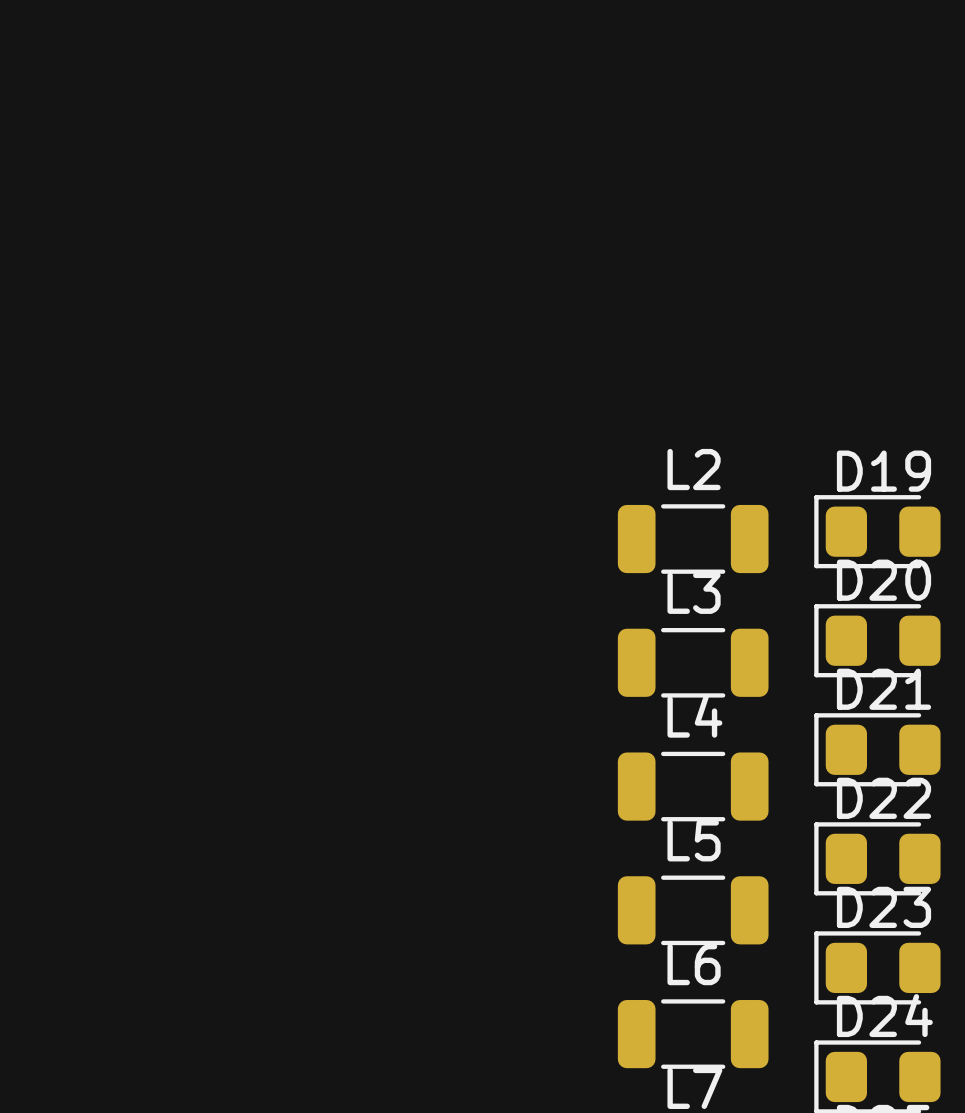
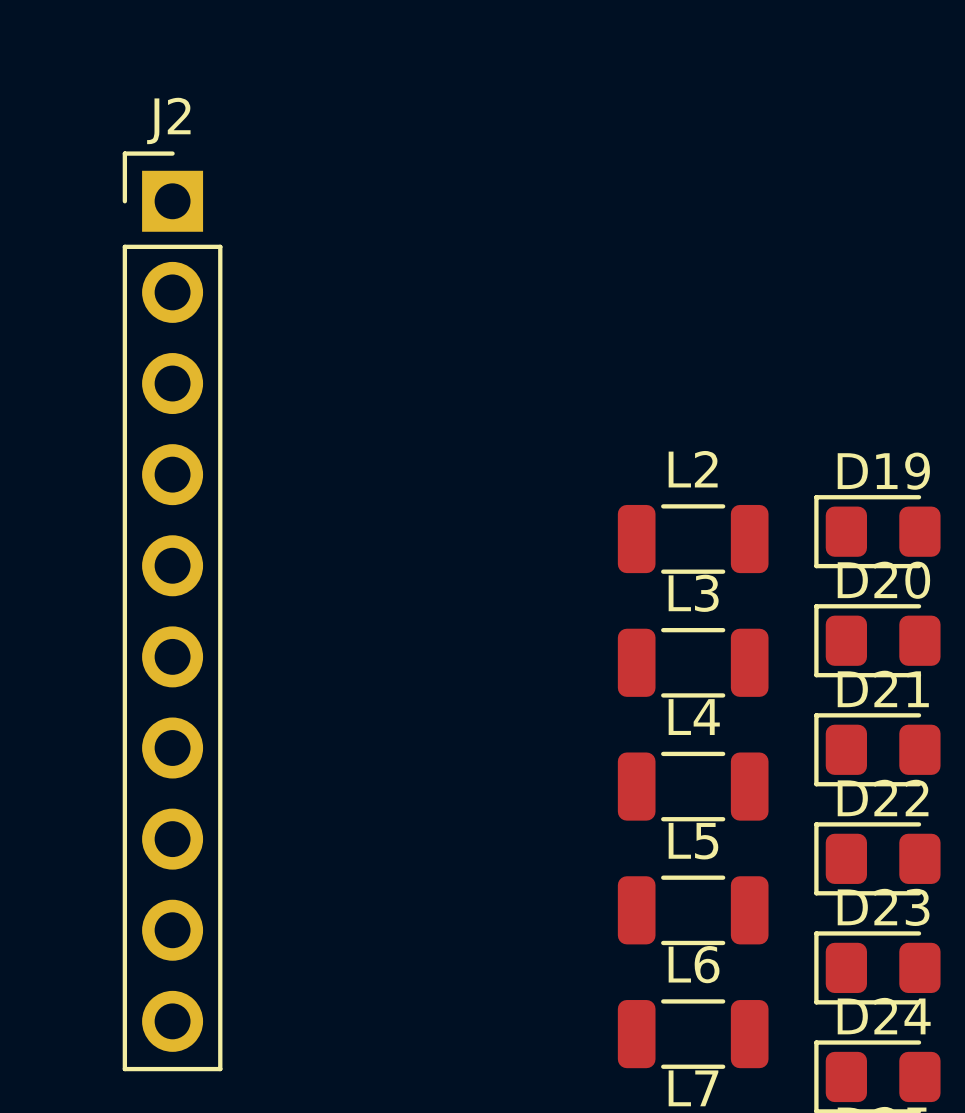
J2: none -> (172, 611)

